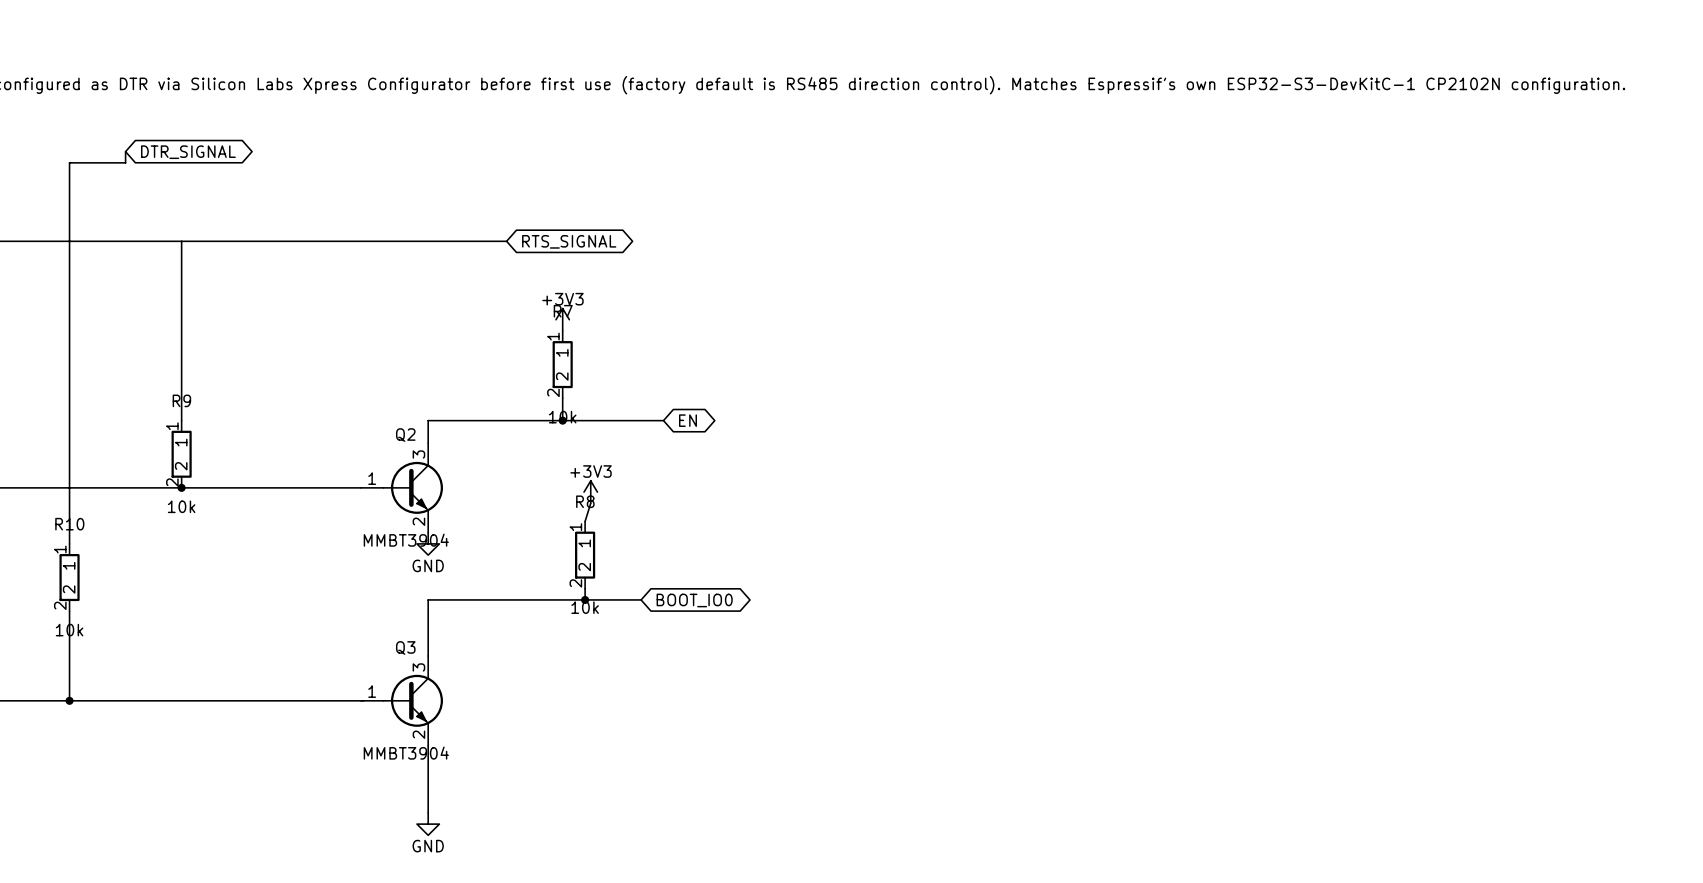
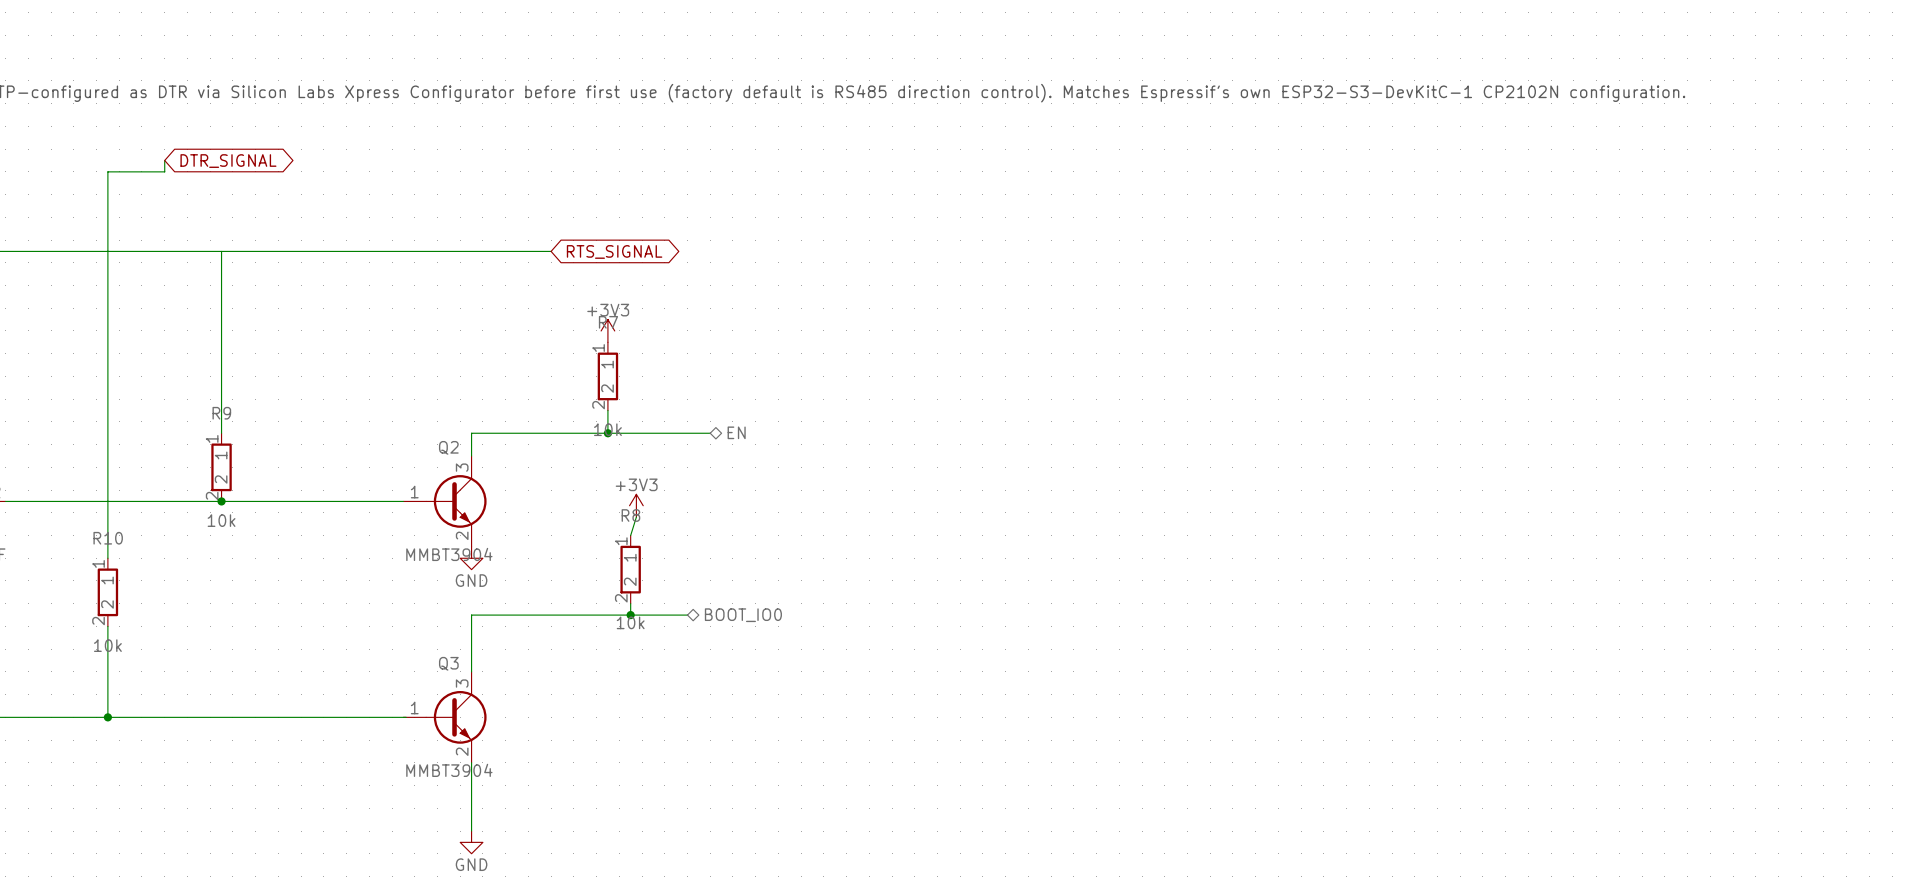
global label: EN (687, 420) -> none
hierarchical label: none -> EN (736, 432)
global label: BOOT_IO0 (694, 600) -> none
hierarchical label: none -> BOOT_IO0 (743, 615)

